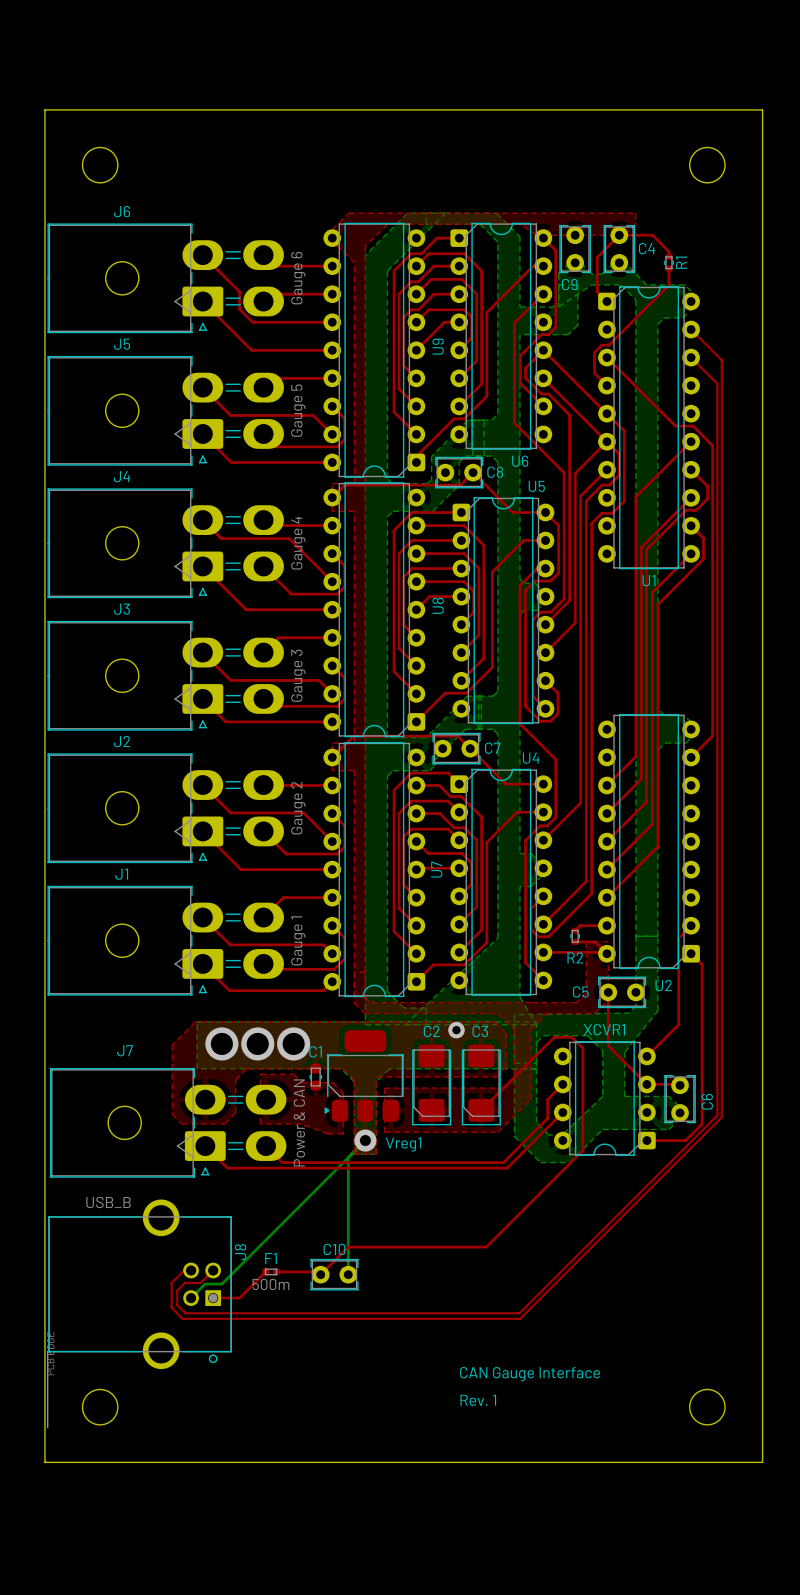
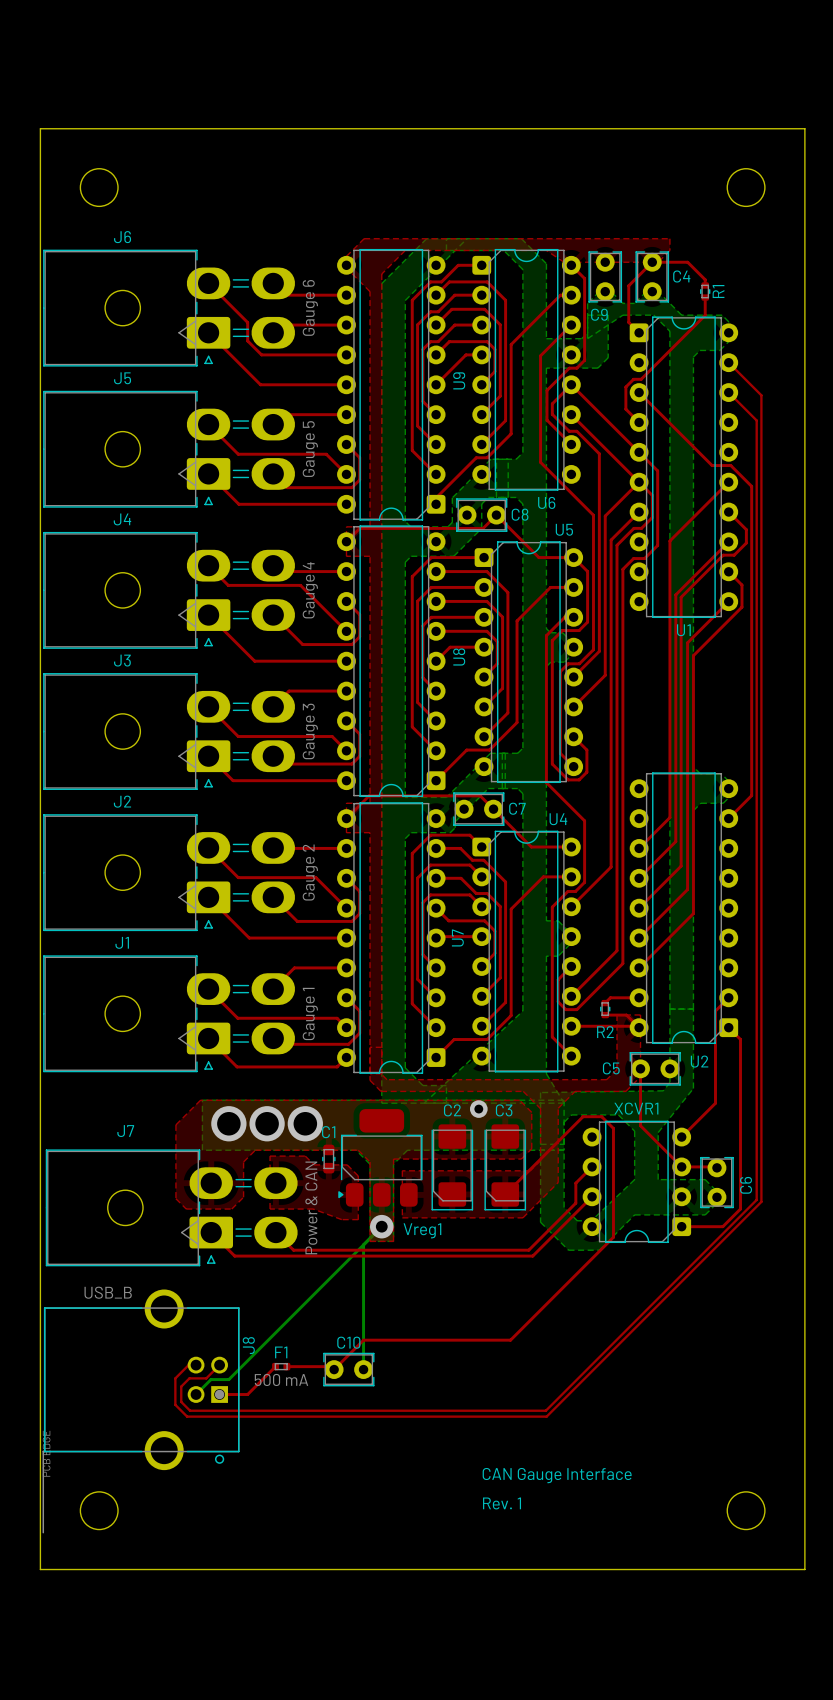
F1 value: 500m (270, 1284) -> 500 mA (281, 1379)

